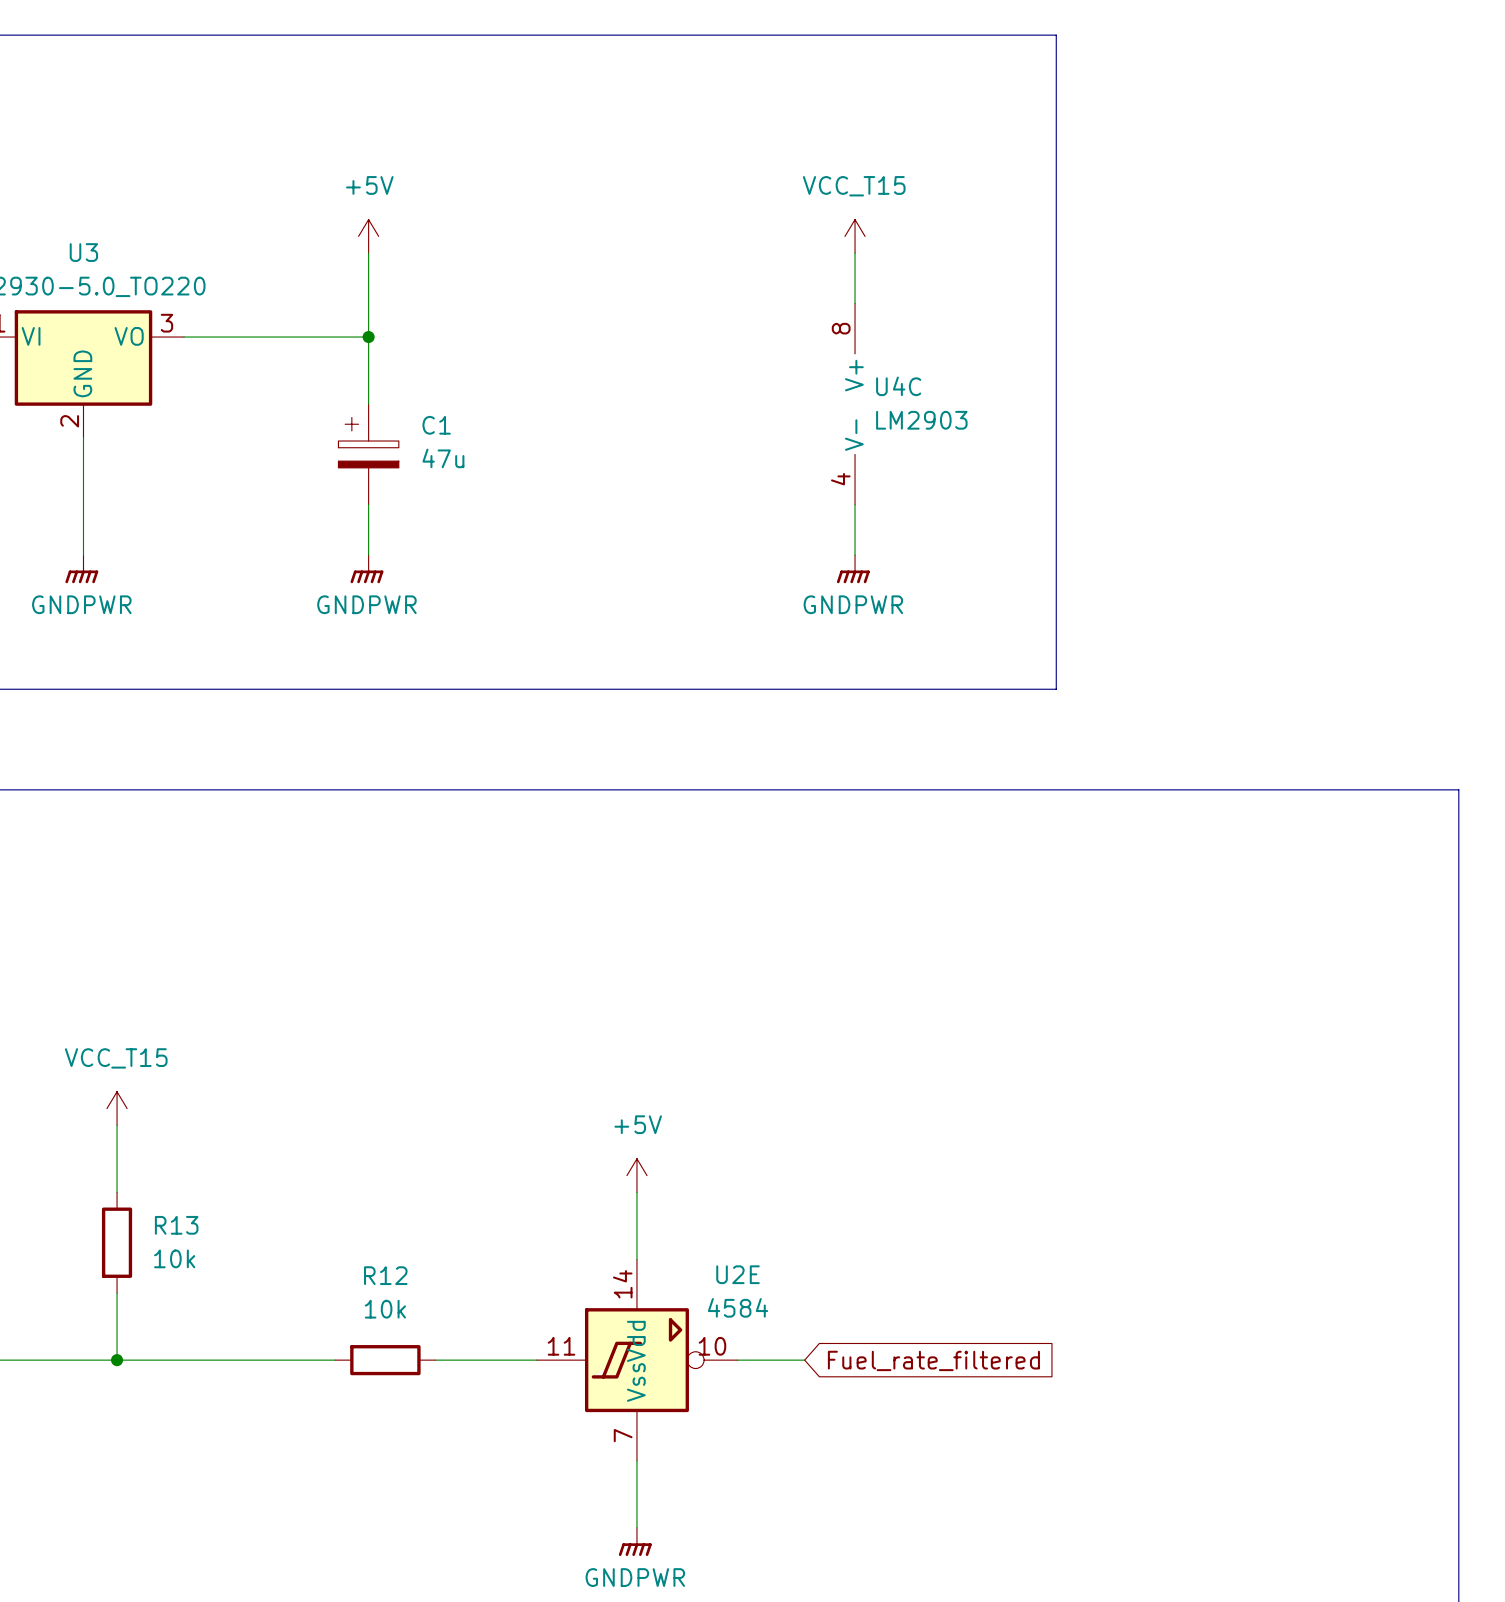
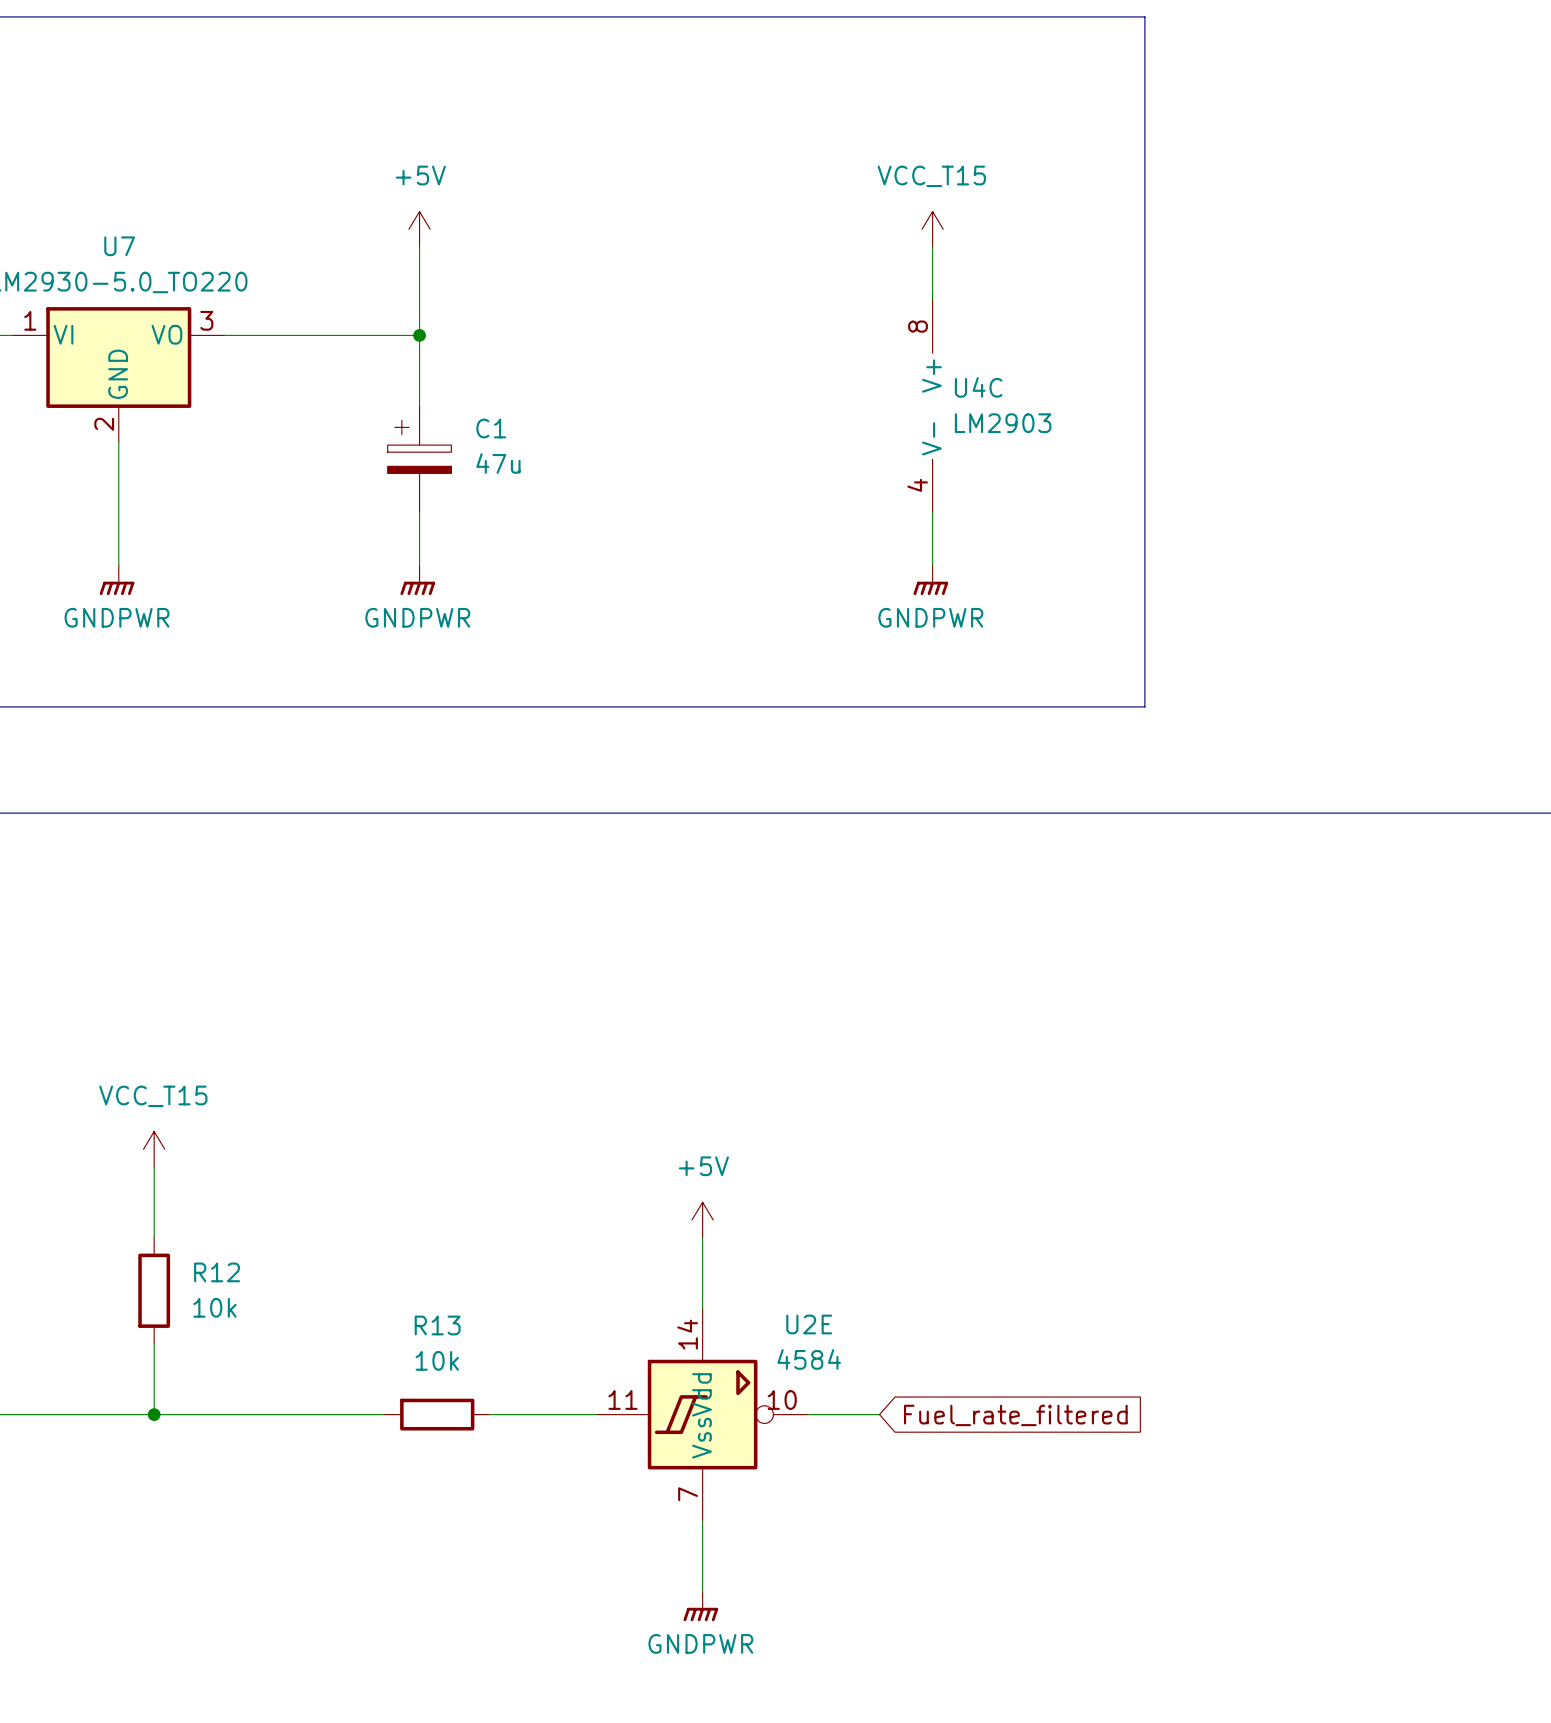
U3 name: U3 (83, 252) -> U7 (119, 246)
R13 name: R13 (176, 1225) -> R12 (217, 1272)
R12 name: R12 (385, 1275) -> R13 (437, 1325)

